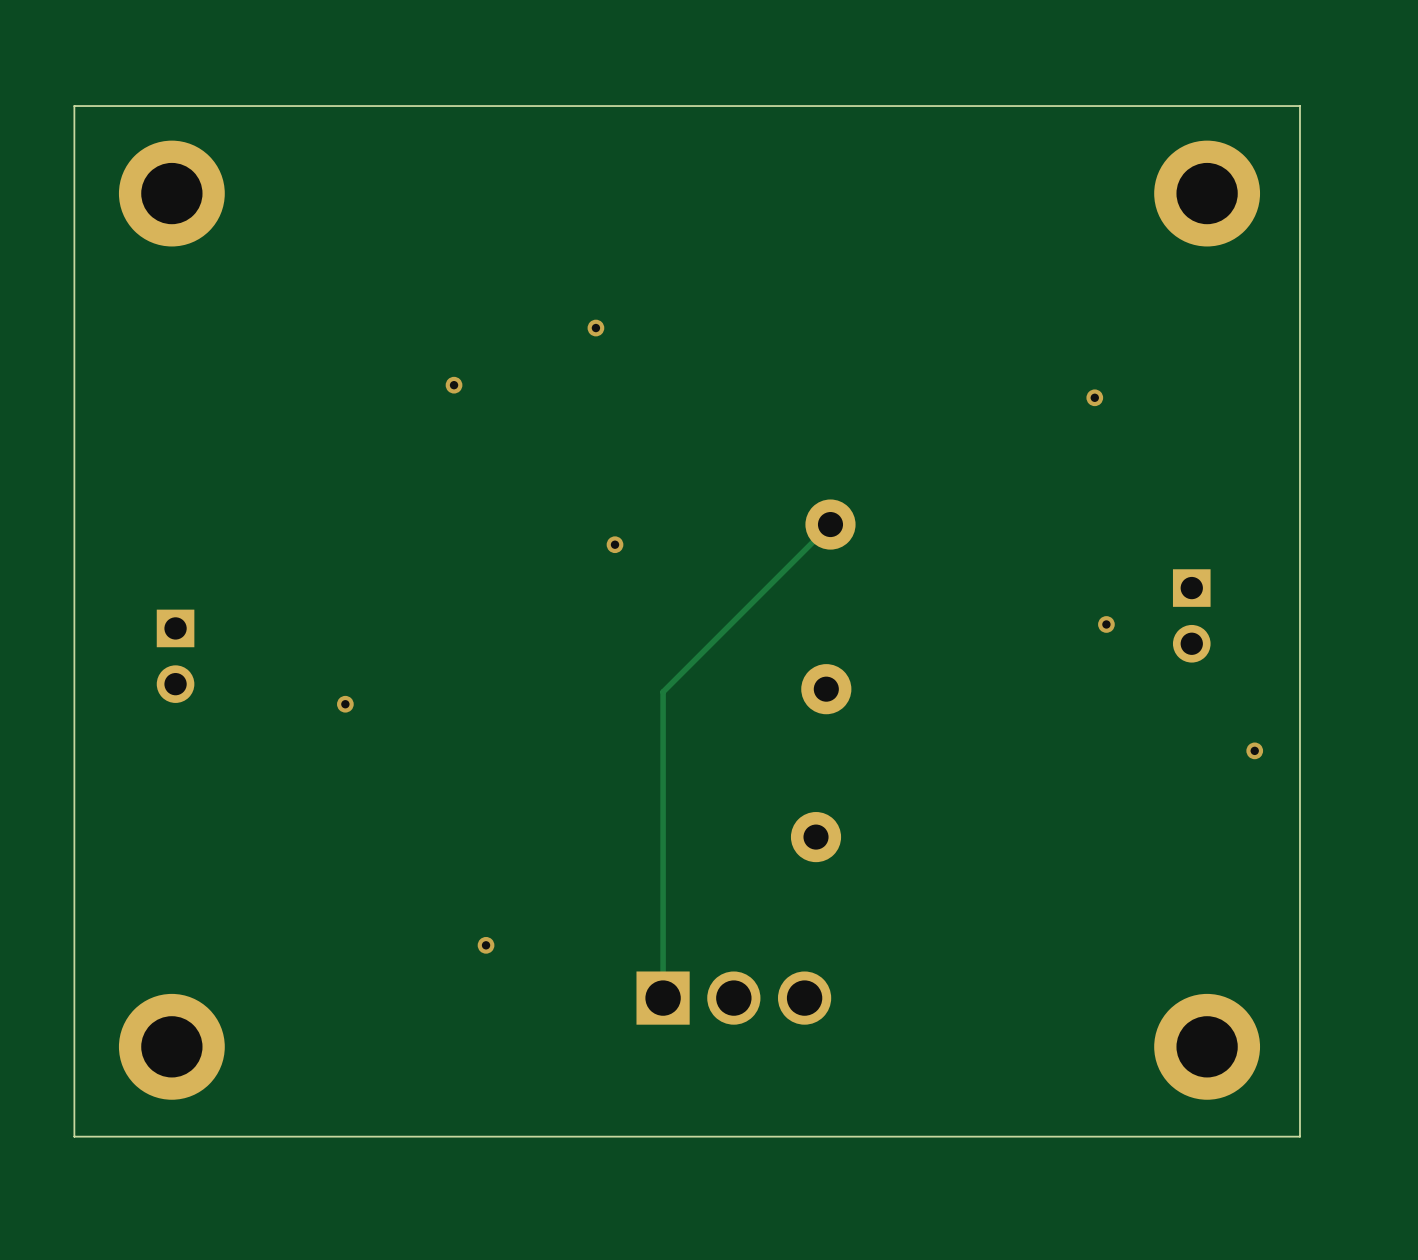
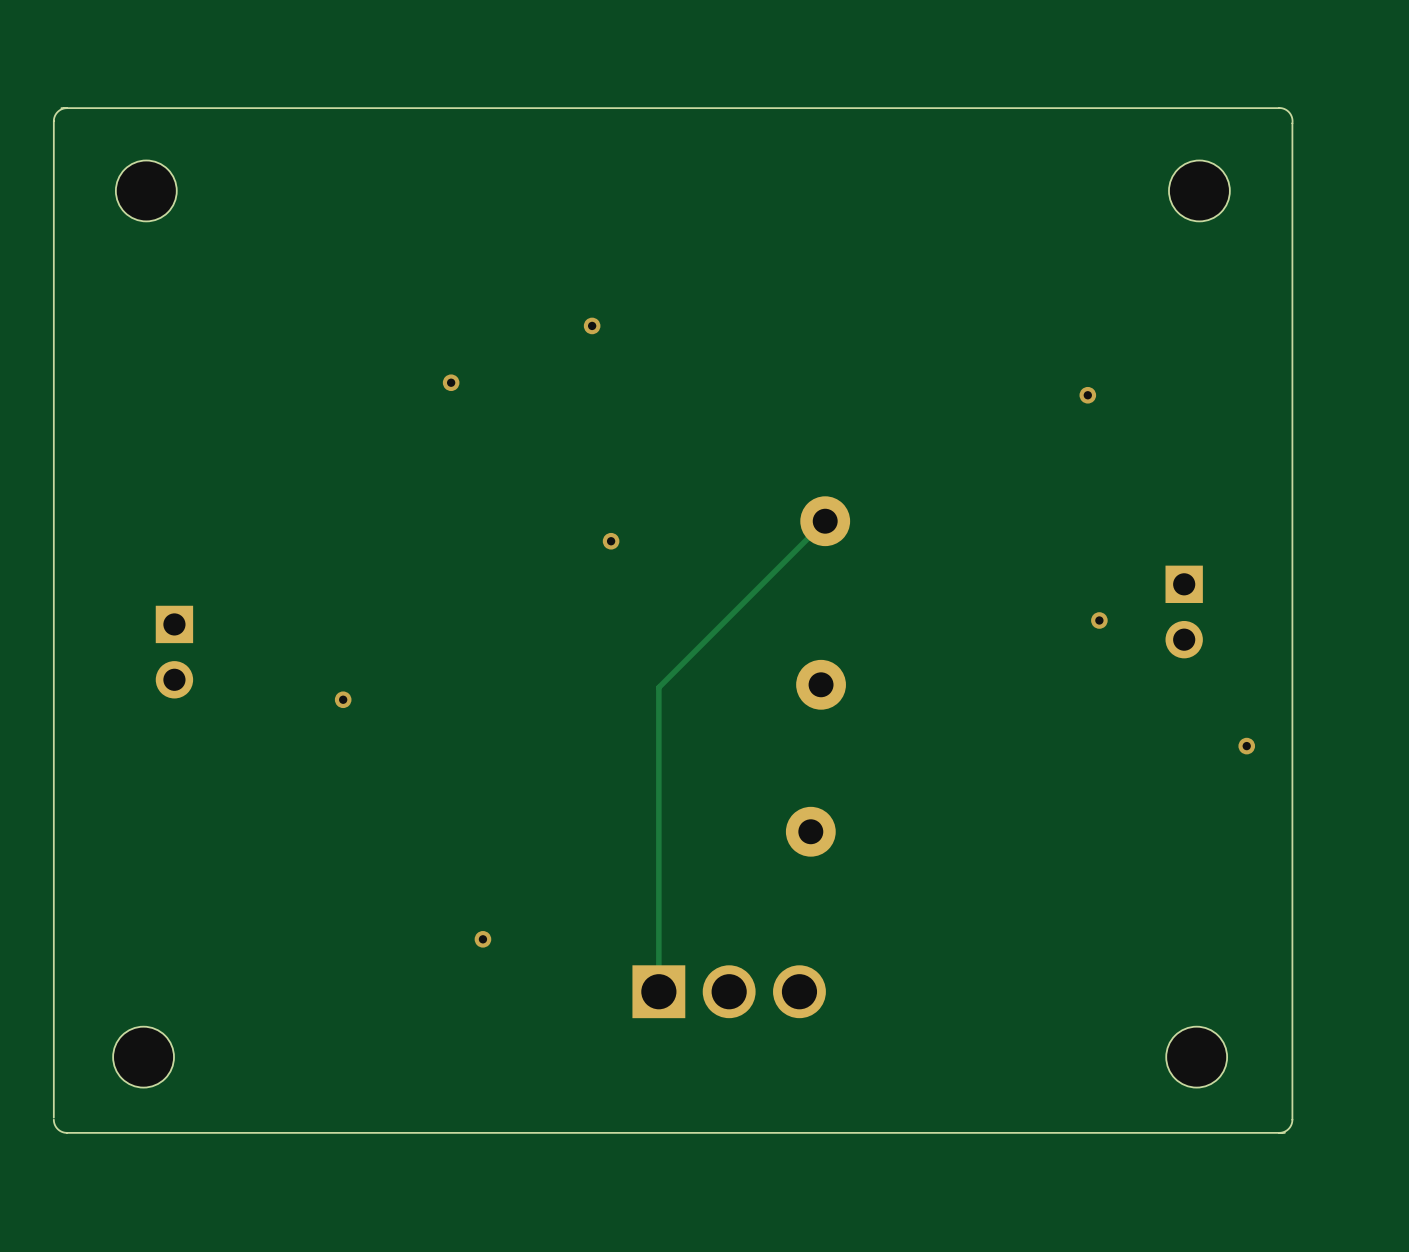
board edge: (1299, 106) (74, 106) (74, 1136) (1299, 1136) (1299, 106) -> none
board edge: none -> (61, 108) (1280, 108) (1288, 111) (1292, 121) (1292, 1119) (1288, 1129) (1279, 1132)
board edge: none -> (66, 108) (57, 111) (53, 121) (53, 1117)
part footprint: [118, 140, 225, 247] -> [115, 160, 177, 222]
part footprint: [1154, 140, 1261, 247] -> [1168, 160, 1230, 222]
part footprint: [1154, 993, 1261, 1100] -> [1166, 1026, 1228, 1088]
part: (171, 1046) -> none
part: none -> (143, 1057)
board edge: none -> (53, 1119) (57, 1129) (66, 1132) (1284, 1132)

